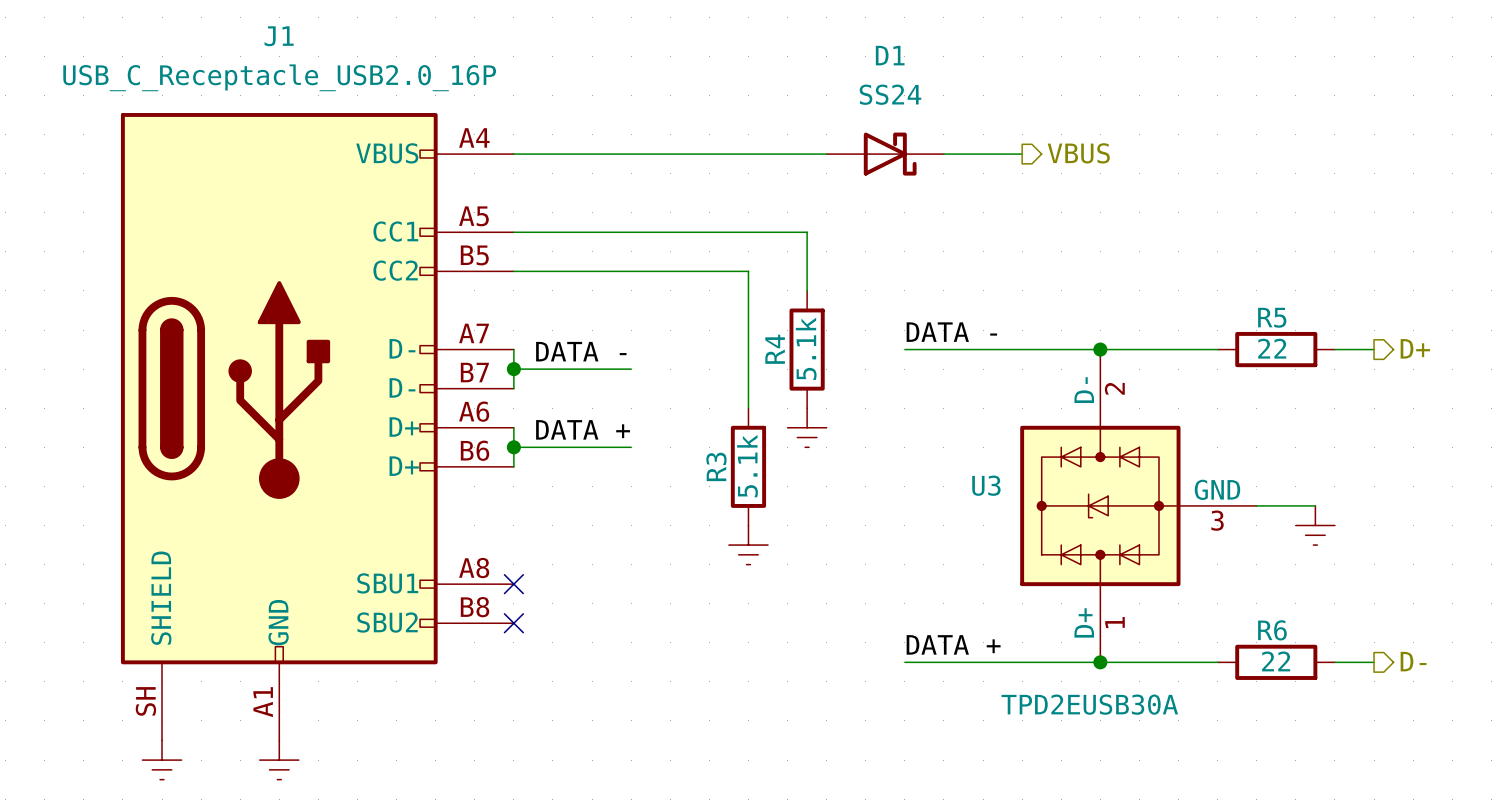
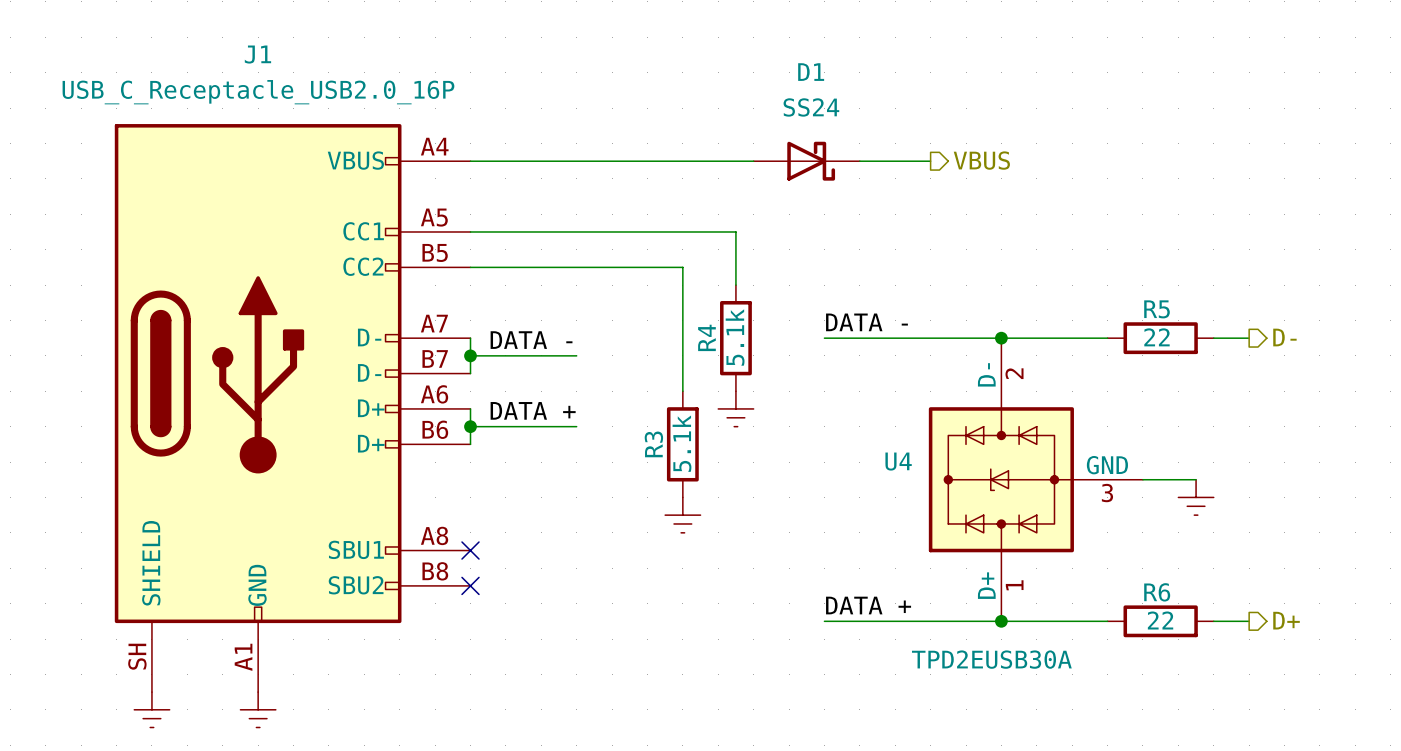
hierarchical label: D+ (1415, 348) -> D- (1284, 337)
U3 name: U3 (986, 485) -> U4 (898, 461)
hierarchical label: D- (1413, 661) -> D+ (1286, 620)

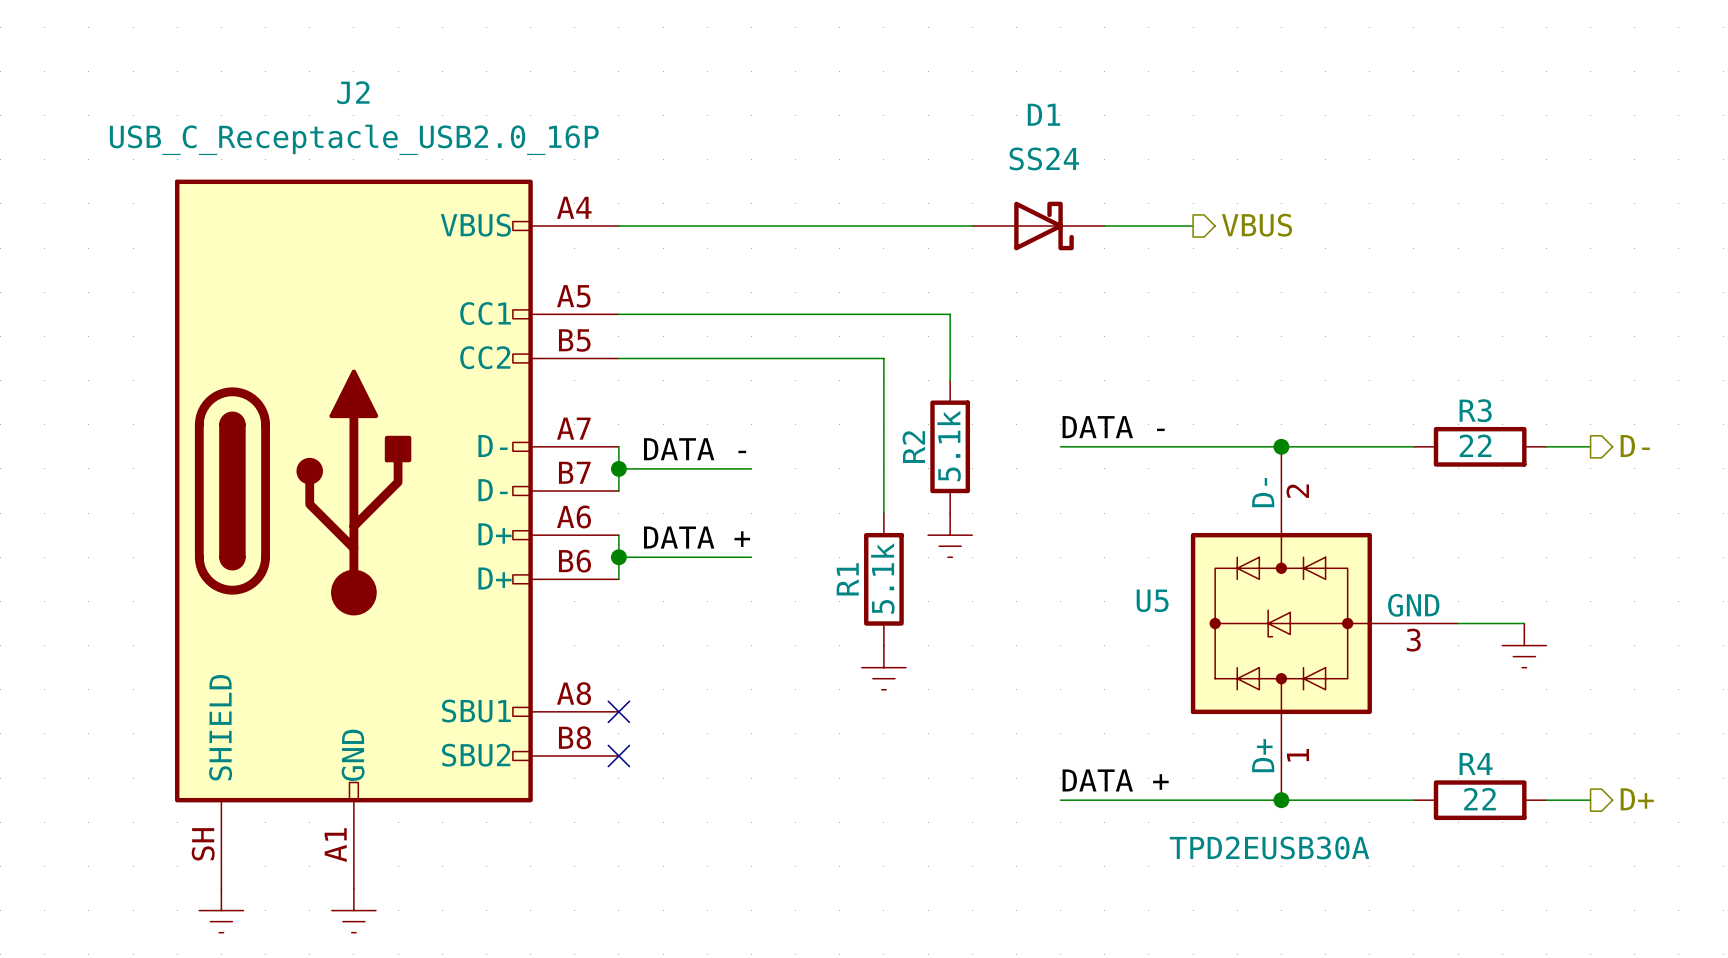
J1 name: J1 (257, 54) -> J2 (353, 92)
R5 name: R5 (1157, 309) -> R3 (1475, 410)
R4 name: R4 (706, 337) -> R2 (913, 447)
R3 name: R3 (653, 444) -> R1 (847, 579)
U4 name: U4 (898, 461) -> U5 (1152, 600)
R6 name: R6 (1157, 592) -> R4 (1476, 764)

